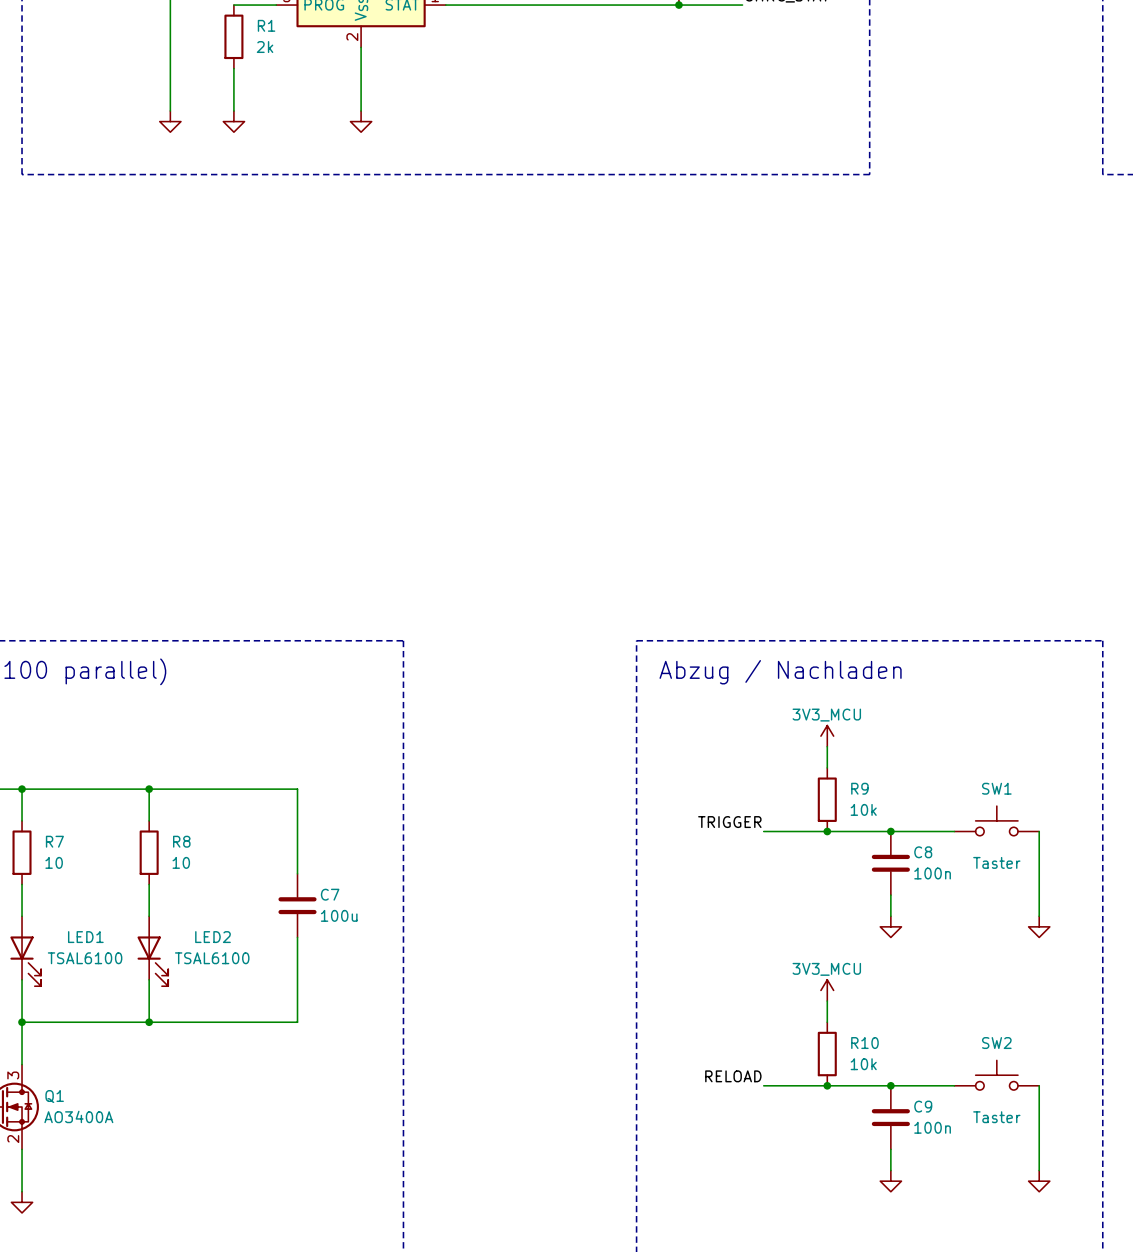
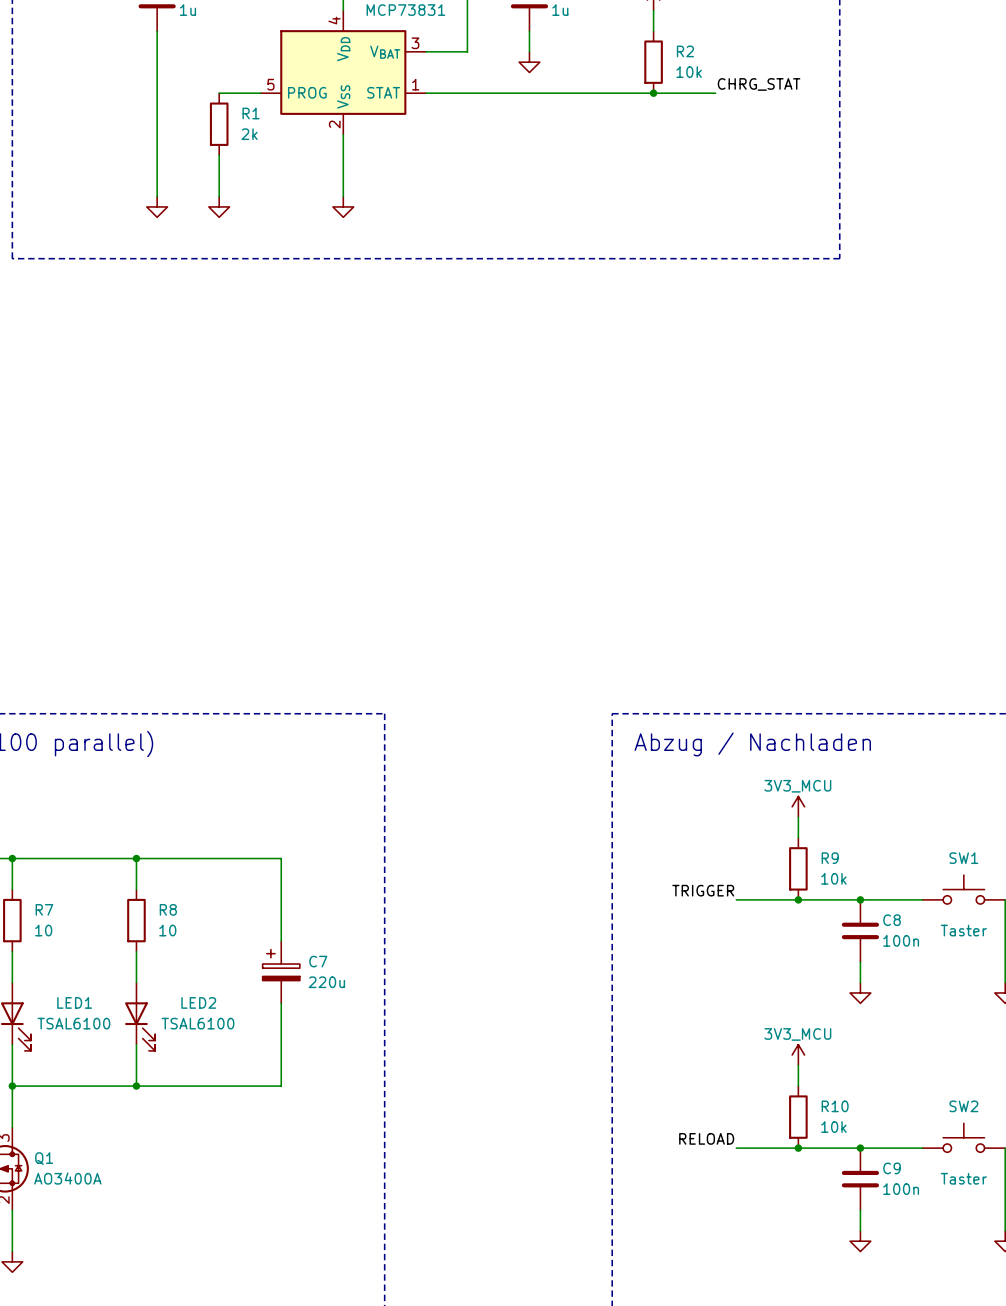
C7 symbol: [278, 873, 317, 938] -> [262, 941, 300, 1004]
C7 value: 100u (339, 915) -> 220u (326, 982)

